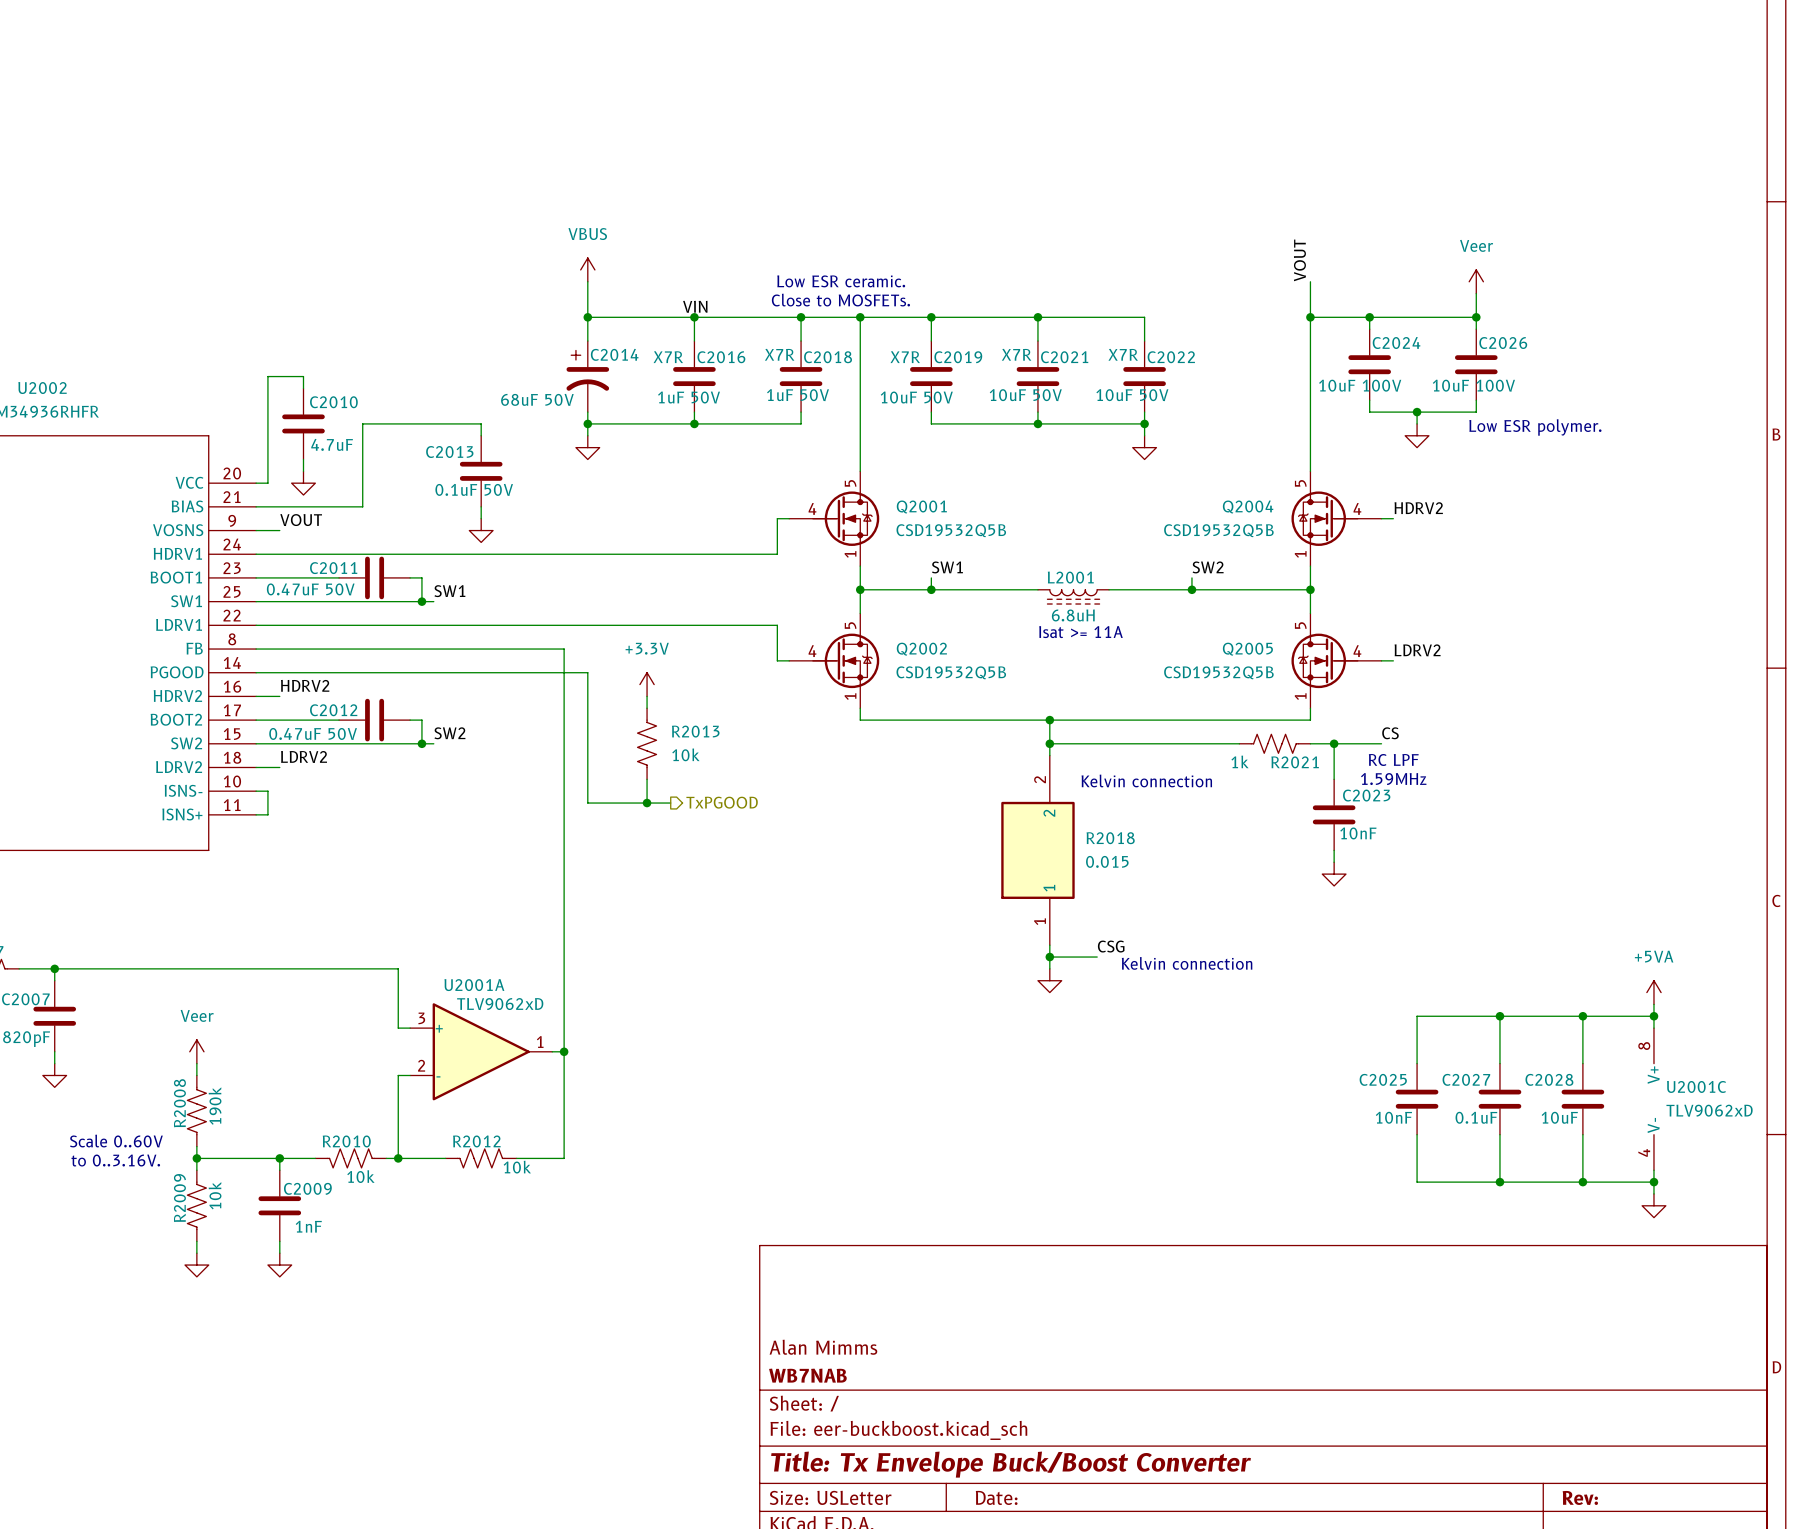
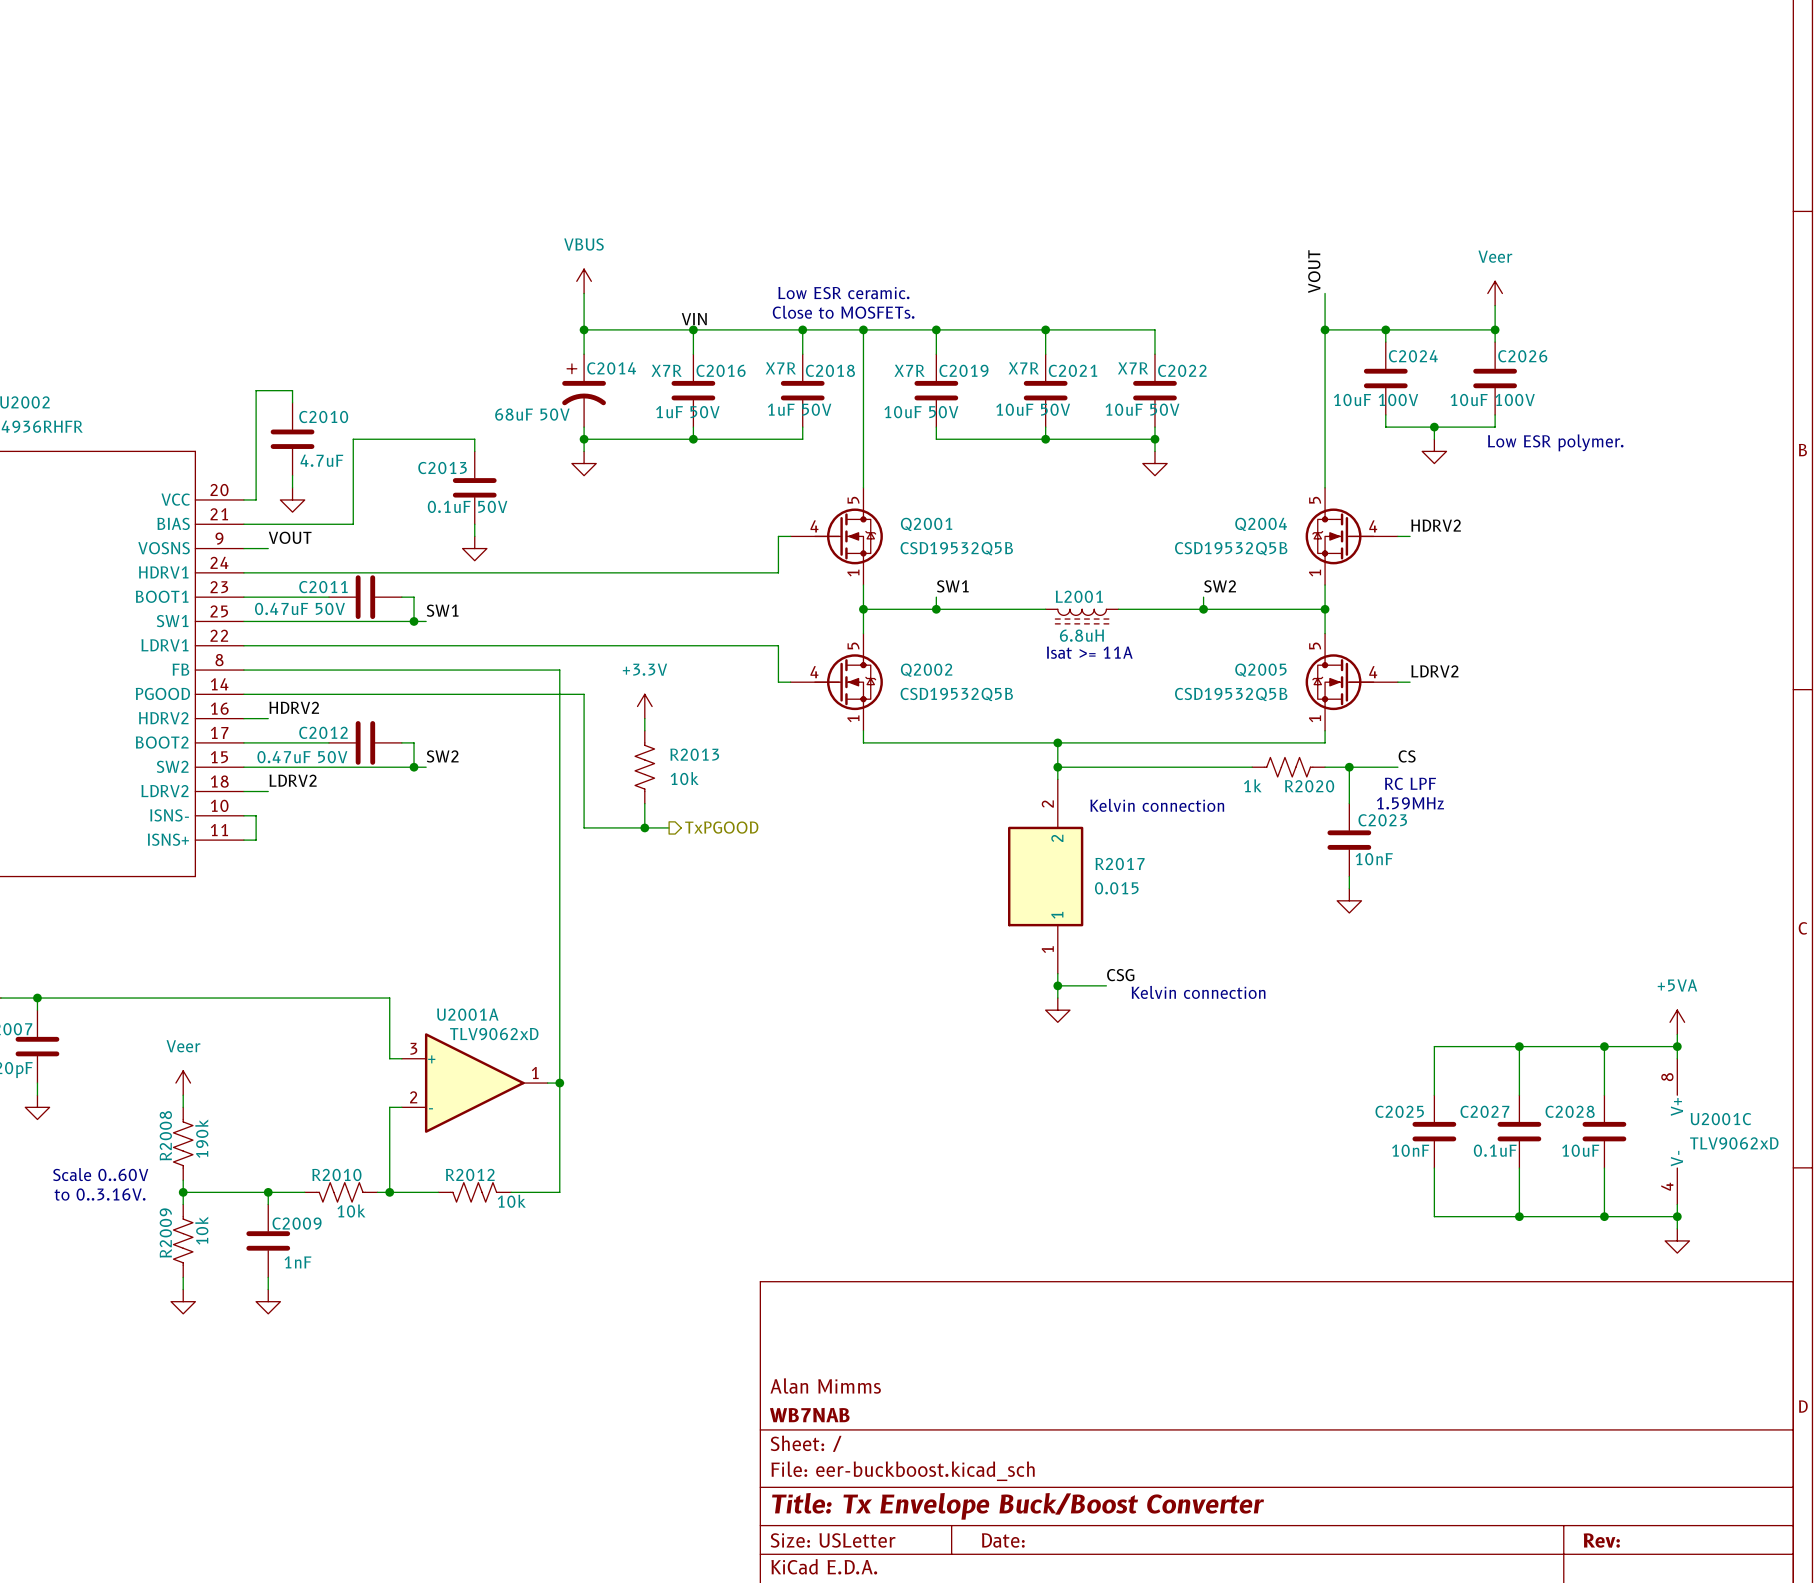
R2021 name: R2021 (1295, 762) -> R2020 (1309, 786)
R2018 name: R2018 (1110, 838) -> R2017 (1120, 864)

